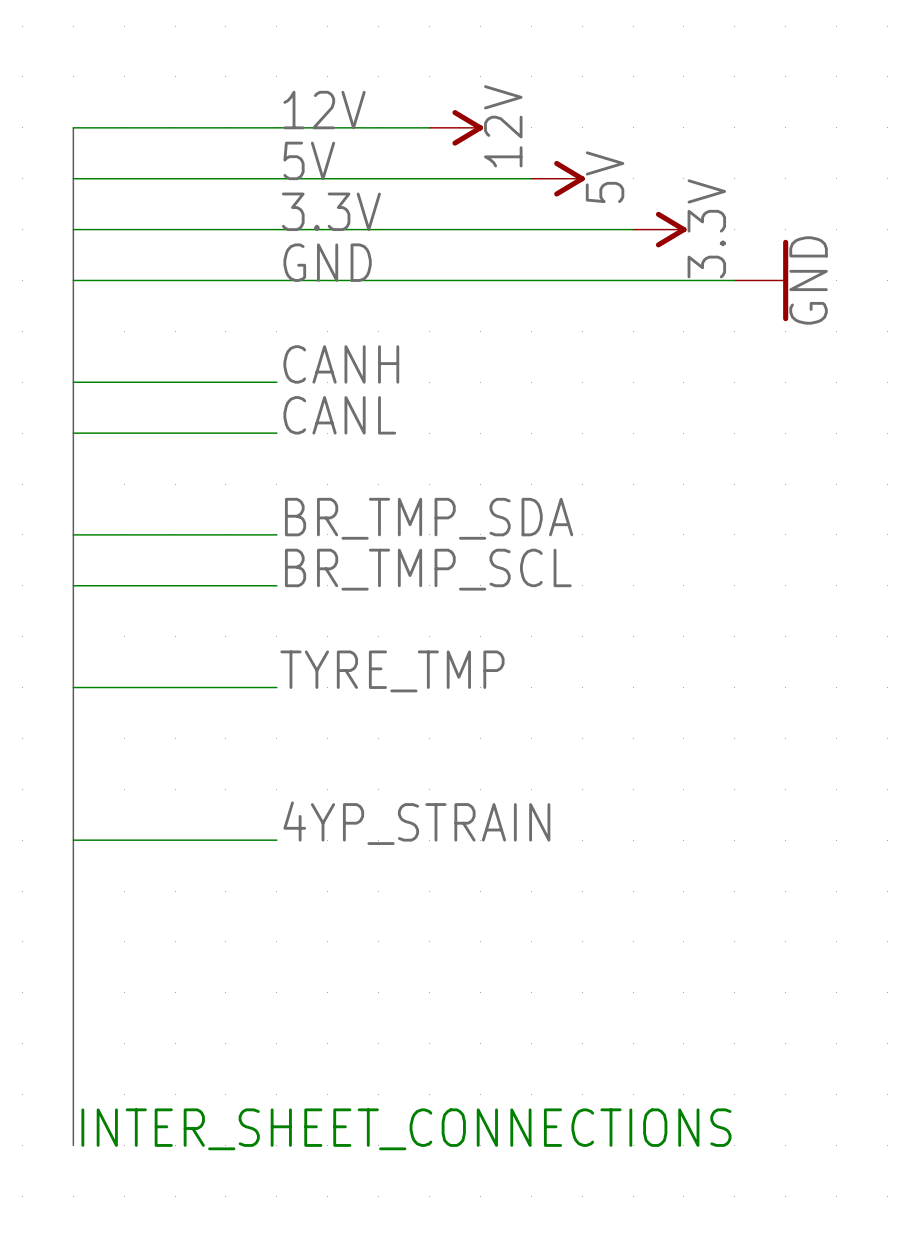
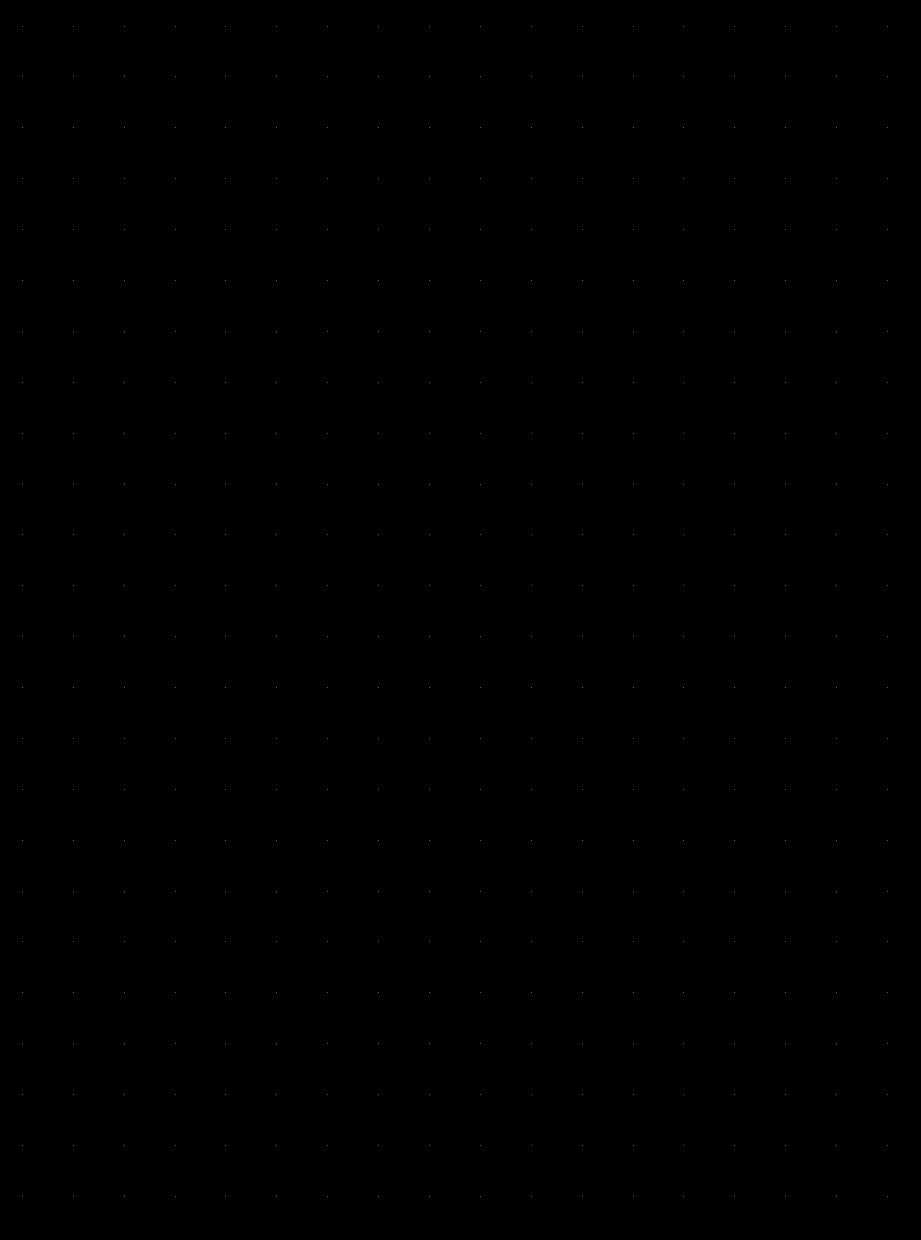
label: 12V (324, 110) -> none
bus: (73, 127) (73, 1145) -> none
wire: (73, 127) (429, 127) -> none
power symbol: 12V (456, 127) -> none
label: 5V (309, 160) -> none
wire: (73, 178) (531, 178) -> none
power symbol: 5V (557, 178) -> none
label: 3.3V (331, 211) -> none
wire: (73, 229) (633, 229) -> none
power symbol: 3.3V (659, 229) -> none
label: GND (327, 262) -> none
wire: (73, 280) (734, 280) -> none
power symbol: GND (761, 280) -> none
label: CANH (341, 364) -> none
wire: (73, 382) (276, 382) -> none
label: CANL (339, 415) -> none
wire: (73, 433) (276, 433) -> none
label: BR_TMP_SDA (429, 518) -> none
wire: (73, 534) (276, 534) -> none
label: BR_TMP_SCL (428, 569) -> none
wire: (73, 585) (276, 585) -> none
label: TYRE_TMP (392, 671) -> none
wire: (73, 687) (276, 687) -> none
label: 4YP_STRAIN (416, 823) -> none
wire: (73, 840) (276, 840) -> none
text: INTER_SHEET_CONNECTIONS (406, 1129) -> none

